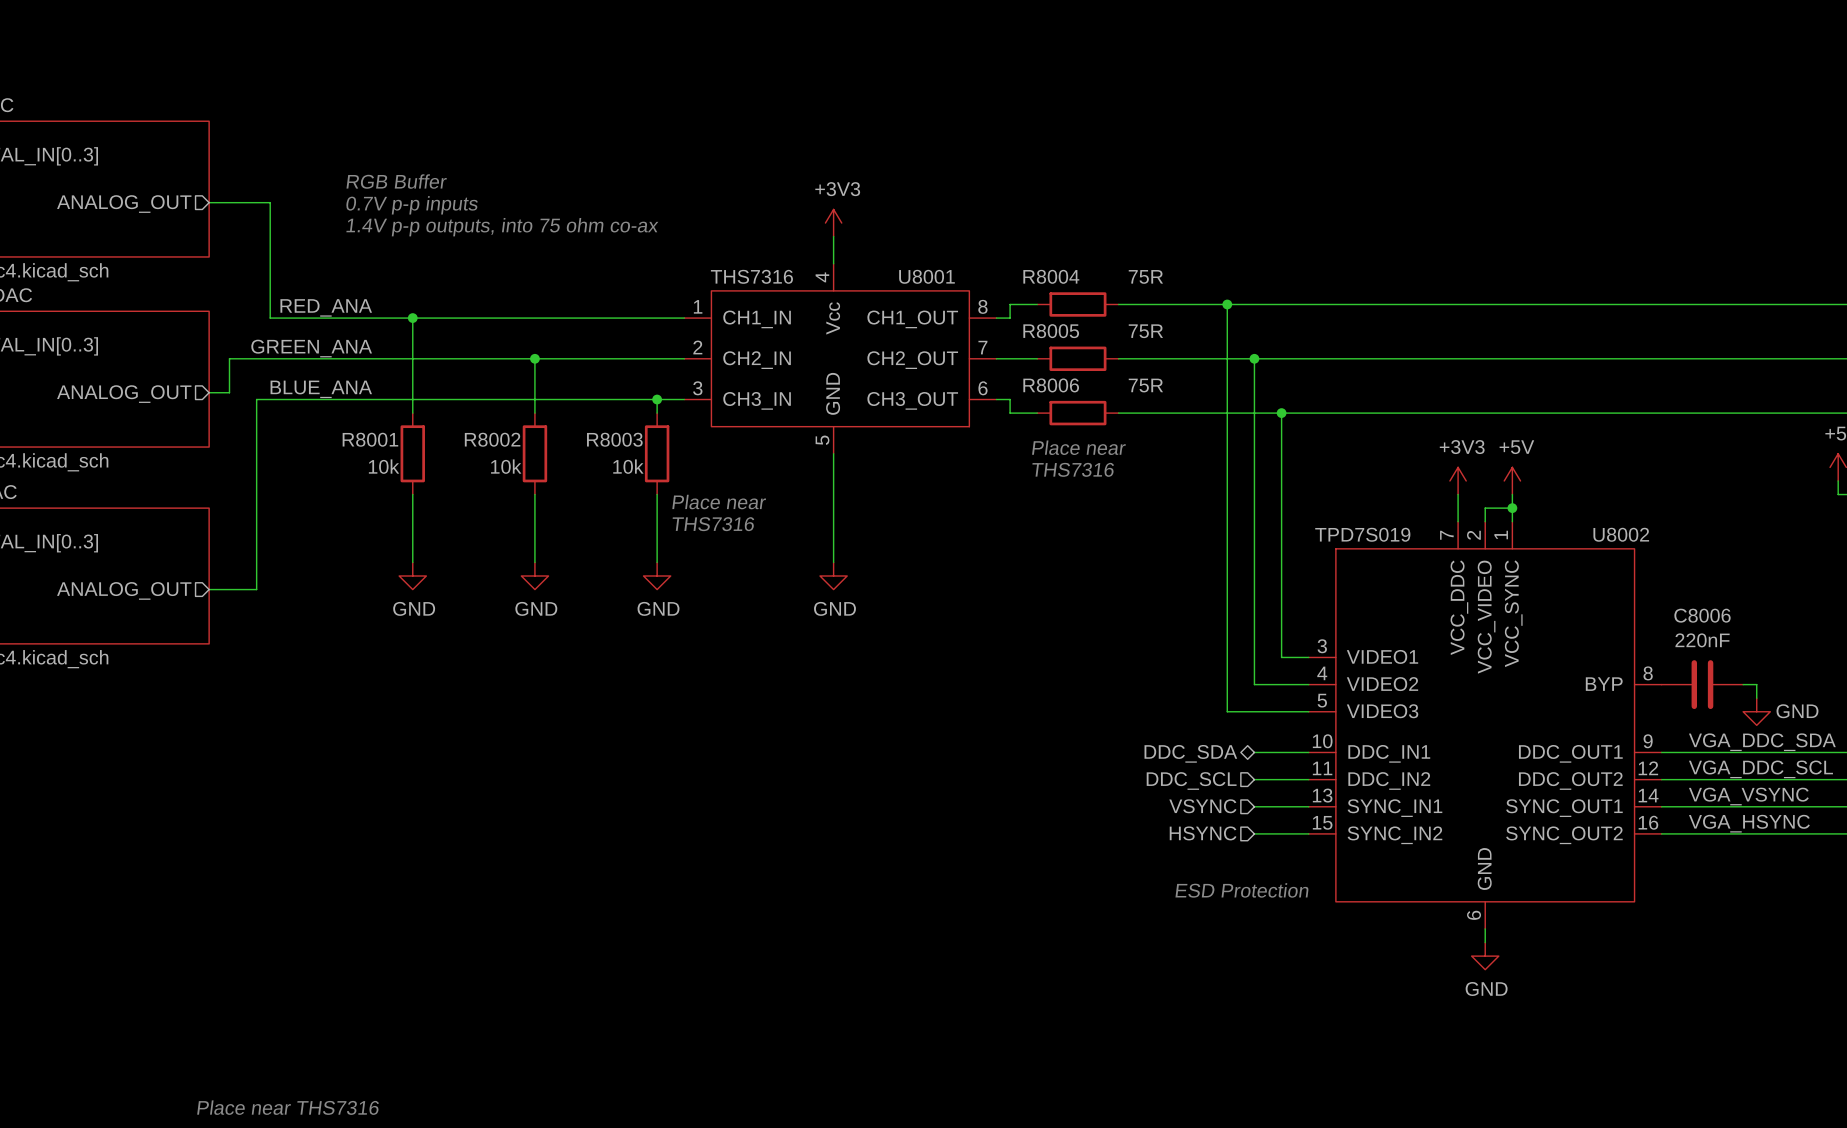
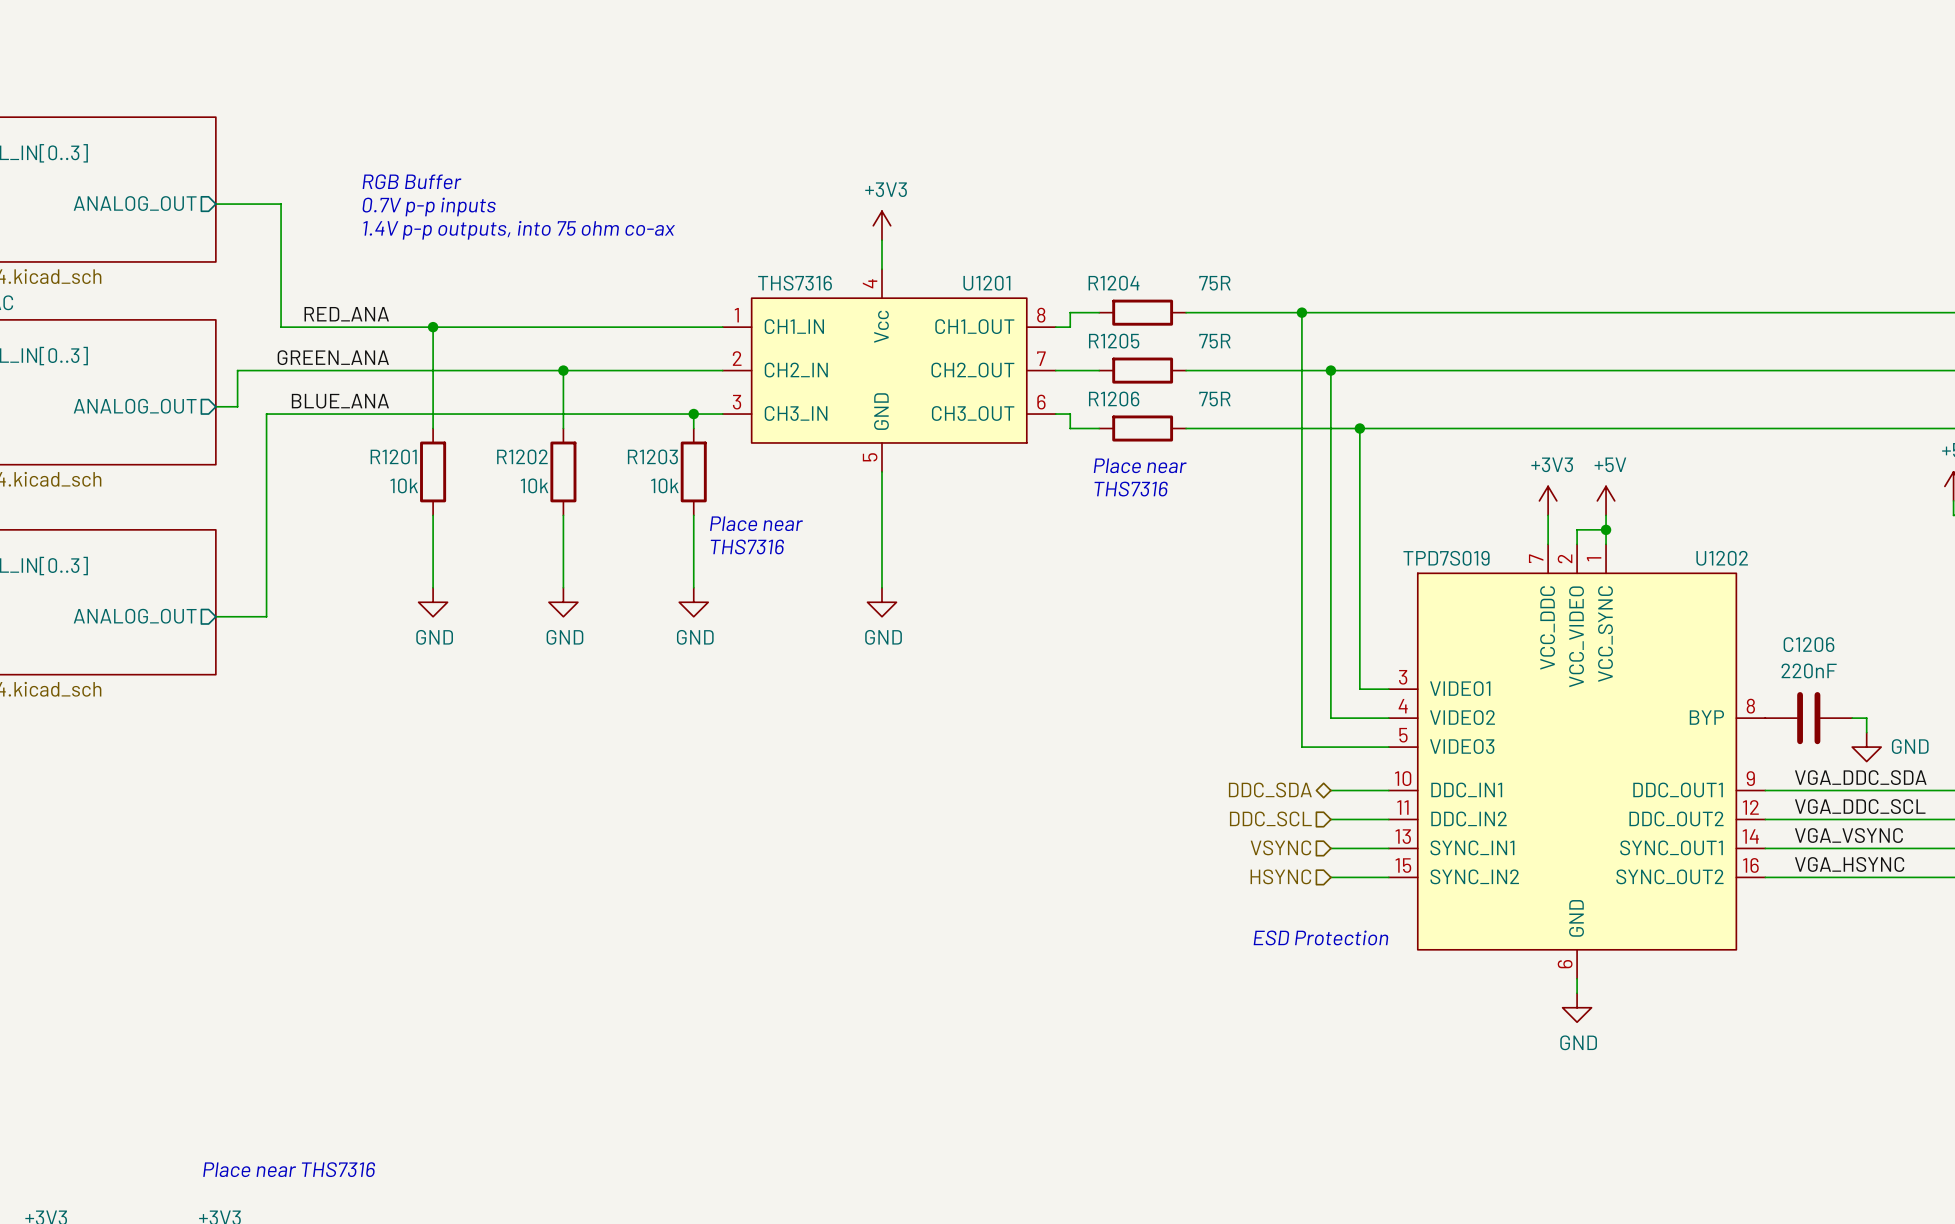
U8001 name: U8001 (926, 276) -> U1201 (986, 283)
R8004 name: R8004 (1051, 276) -> R1204 (1114, 283)
R8005 name: R8005 (1051, 331) -> R1205 (1114, 341)
R8006 name: R8006 (1051, 385) -> R1206 (1114, 399)
R8001 name: R8001 (370, 439) -> R1201 (393, 456)
R8002 name: R8002 (492, 439) -> R1202 (522, 456)
R8003 name: R8003 (614, 439) -> R1203 (652, 456)
U8002 name: U8002 (1621, 534) -> U1202 (1722, 558)
C8006 name: C8006 (1702, 615) -> C1206 (1808, 644)

